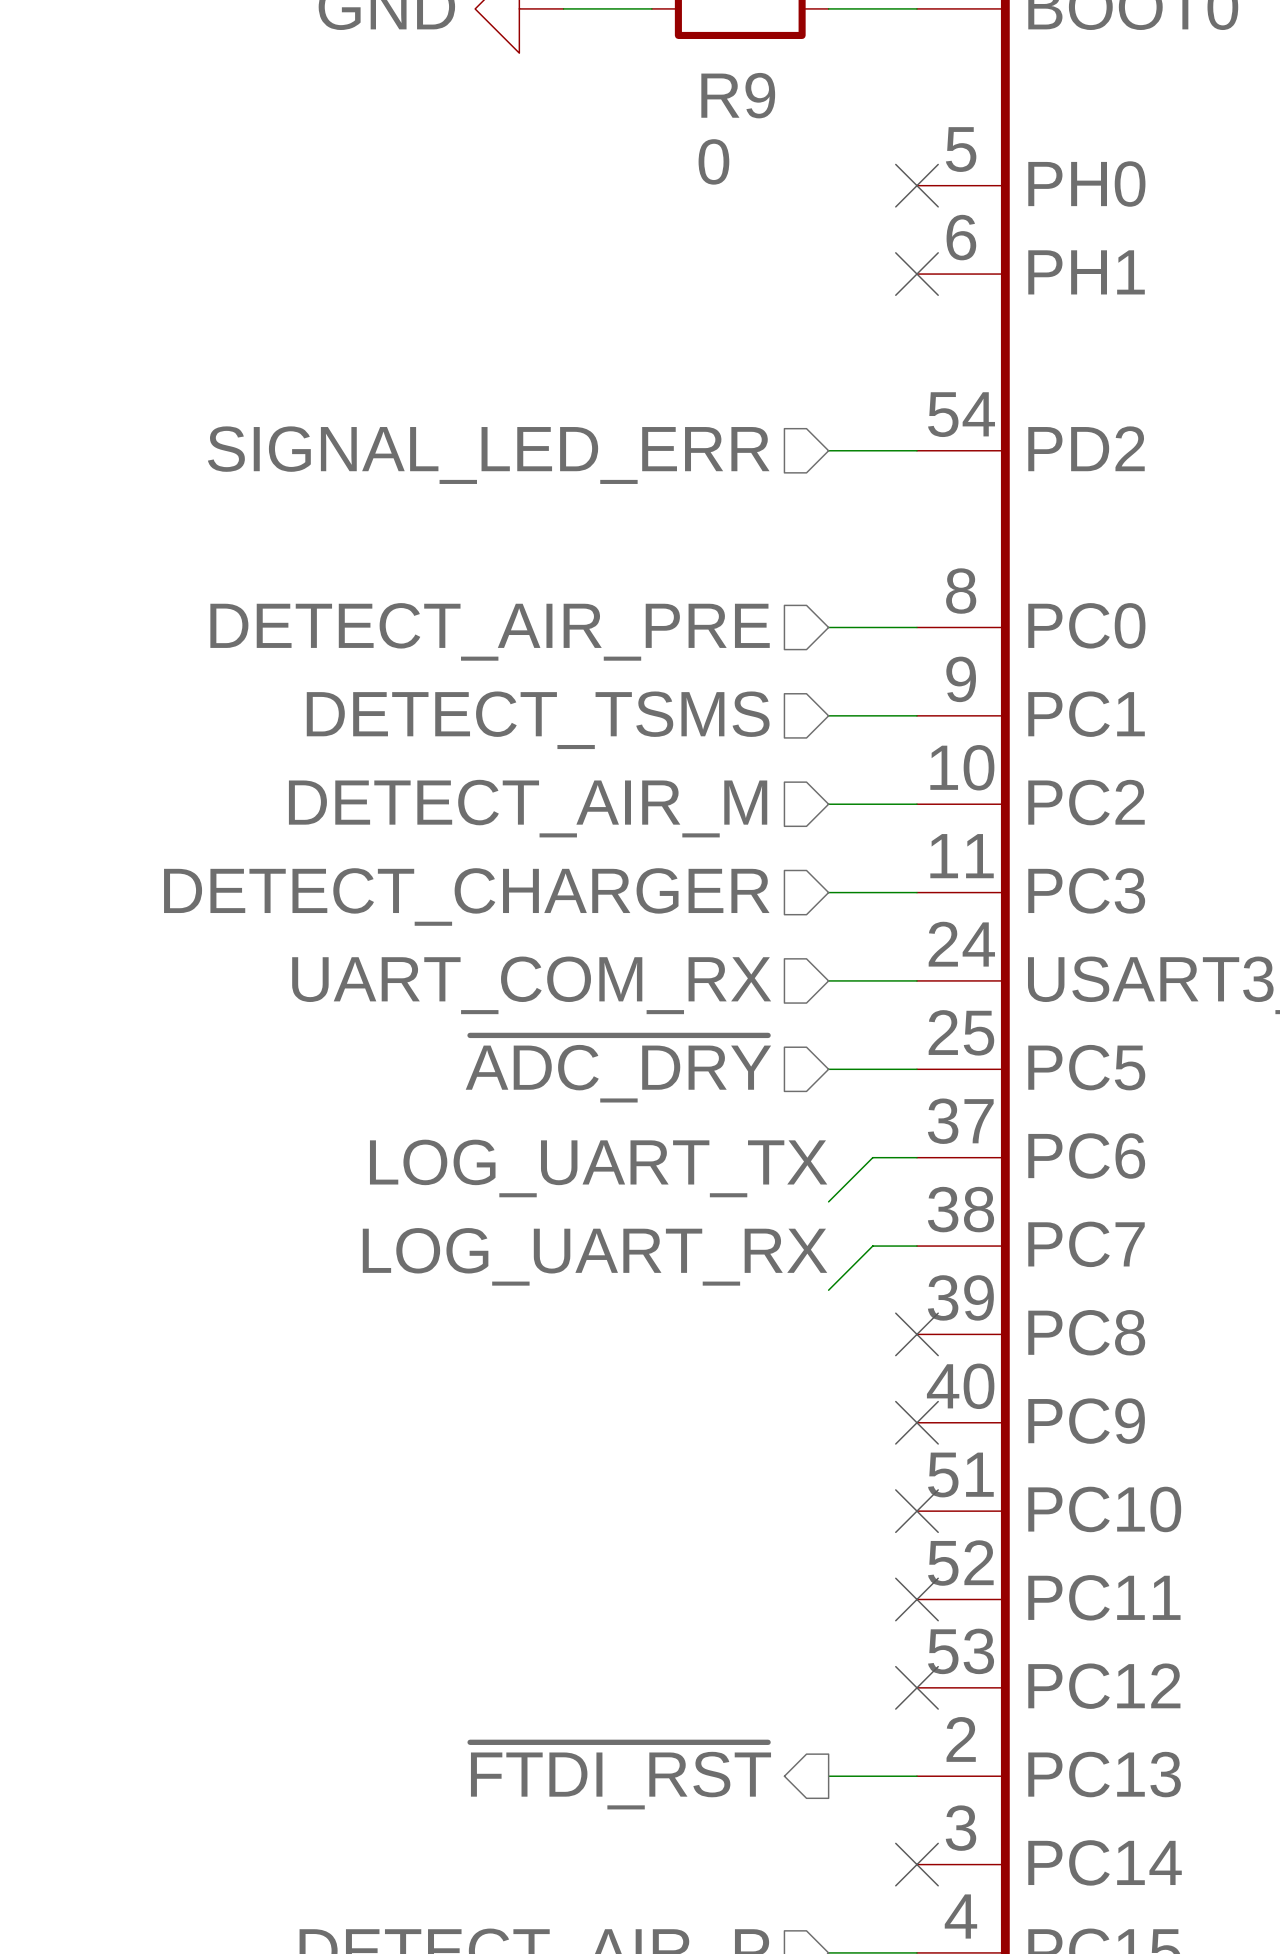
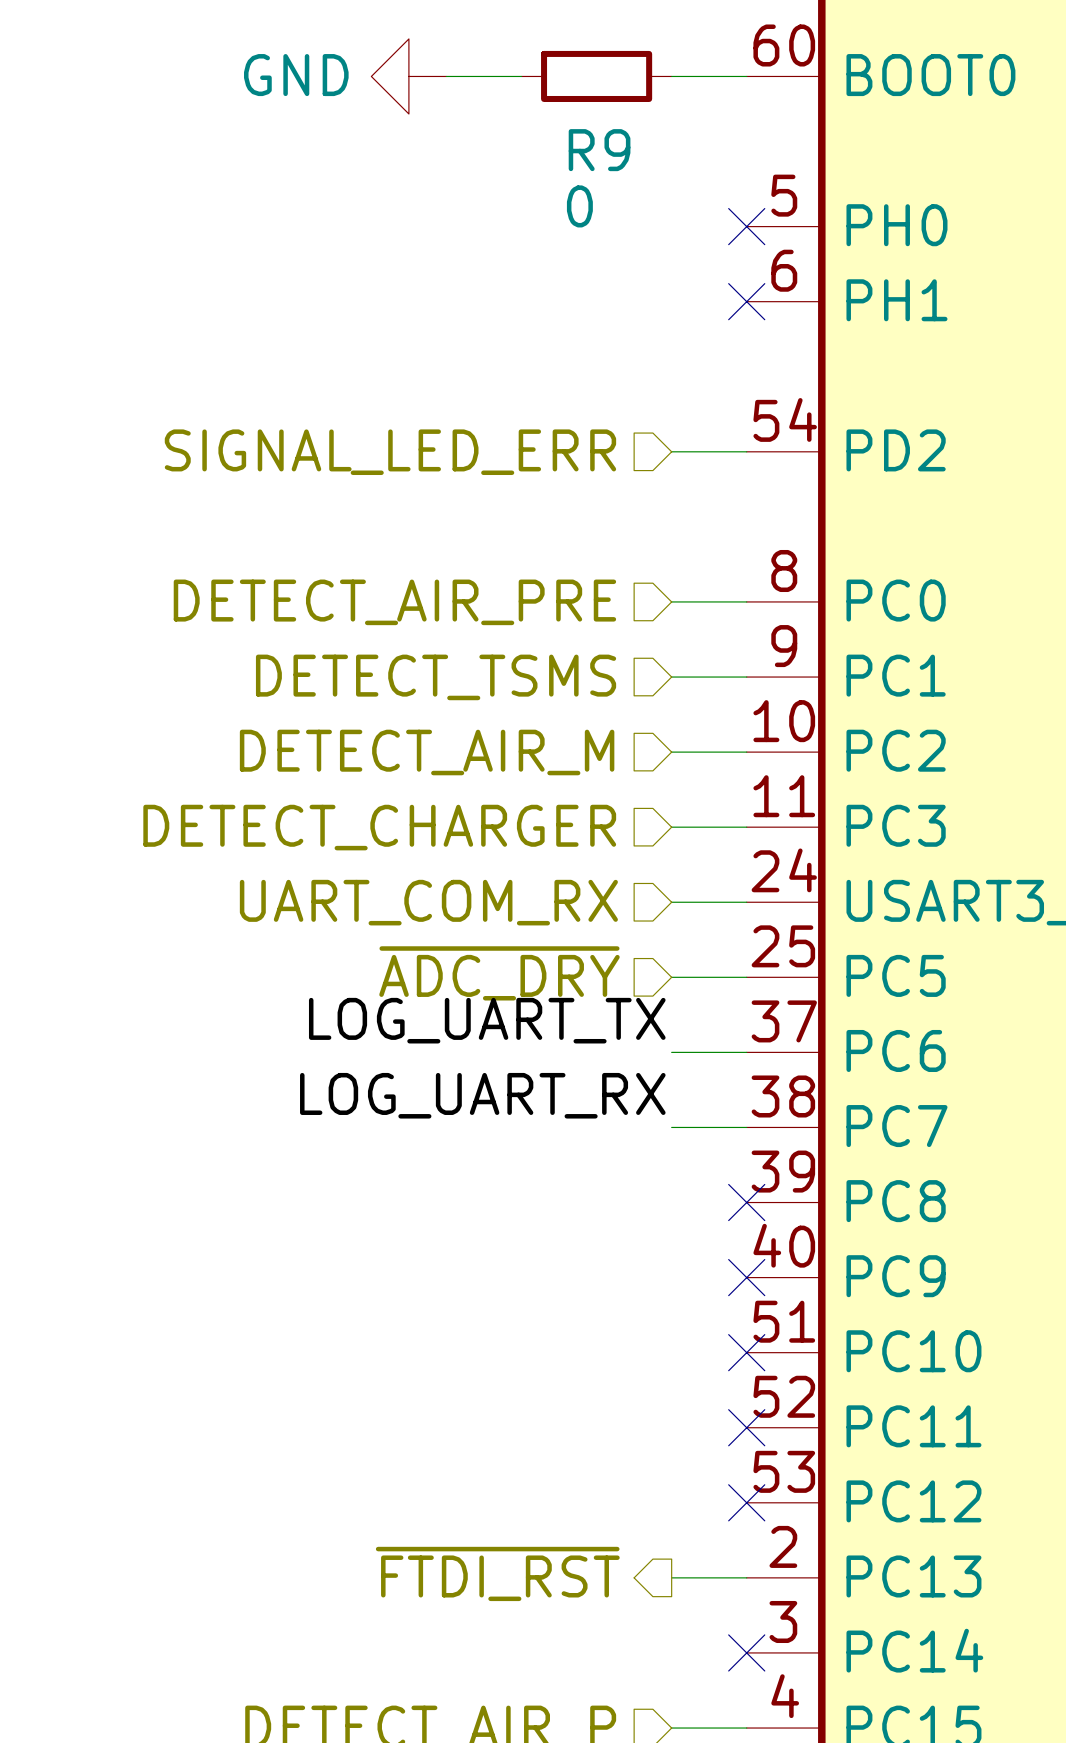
wire: (872, 1157) (828, 1201) -> (709, 1052) (671, 1052)
label position: LOG_UART_TX (598, 1168) -> LOG_UART_TX (487, 1020)
wire: (872, 1246) (828, 1290) -> (709, 1127) (671, 1127)
label position: LOG_UART_RX (595, 1256) -> LOG_UART_RX (482, 1095)

